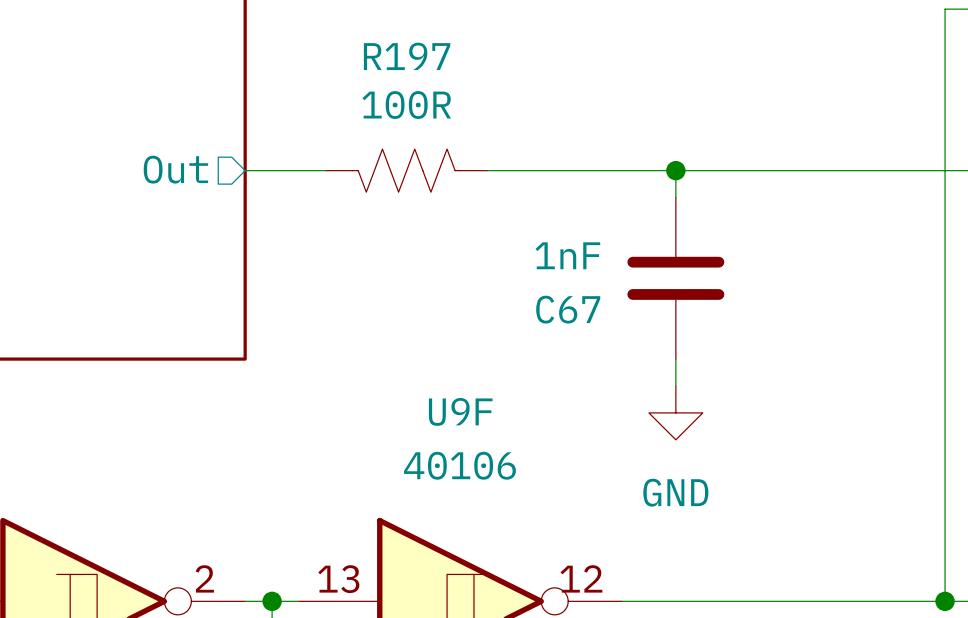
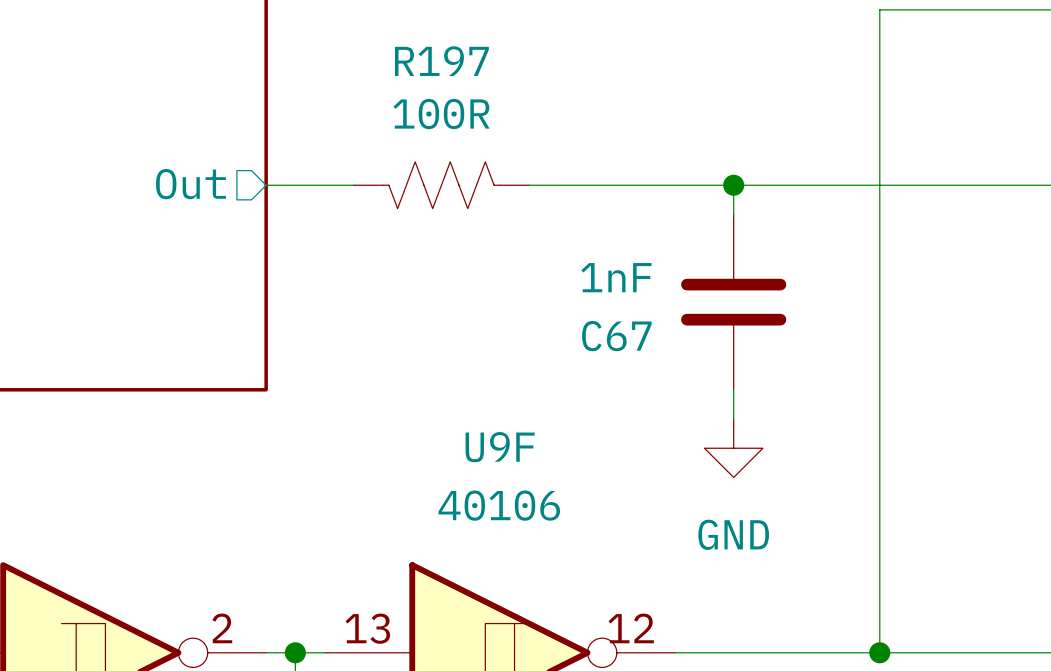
wire: (945, 9) (945, 601) -> (1025, 9) (879, 9) (879, 652)
junction: none -> (879, 652)
junction: (945, 601) -> none

